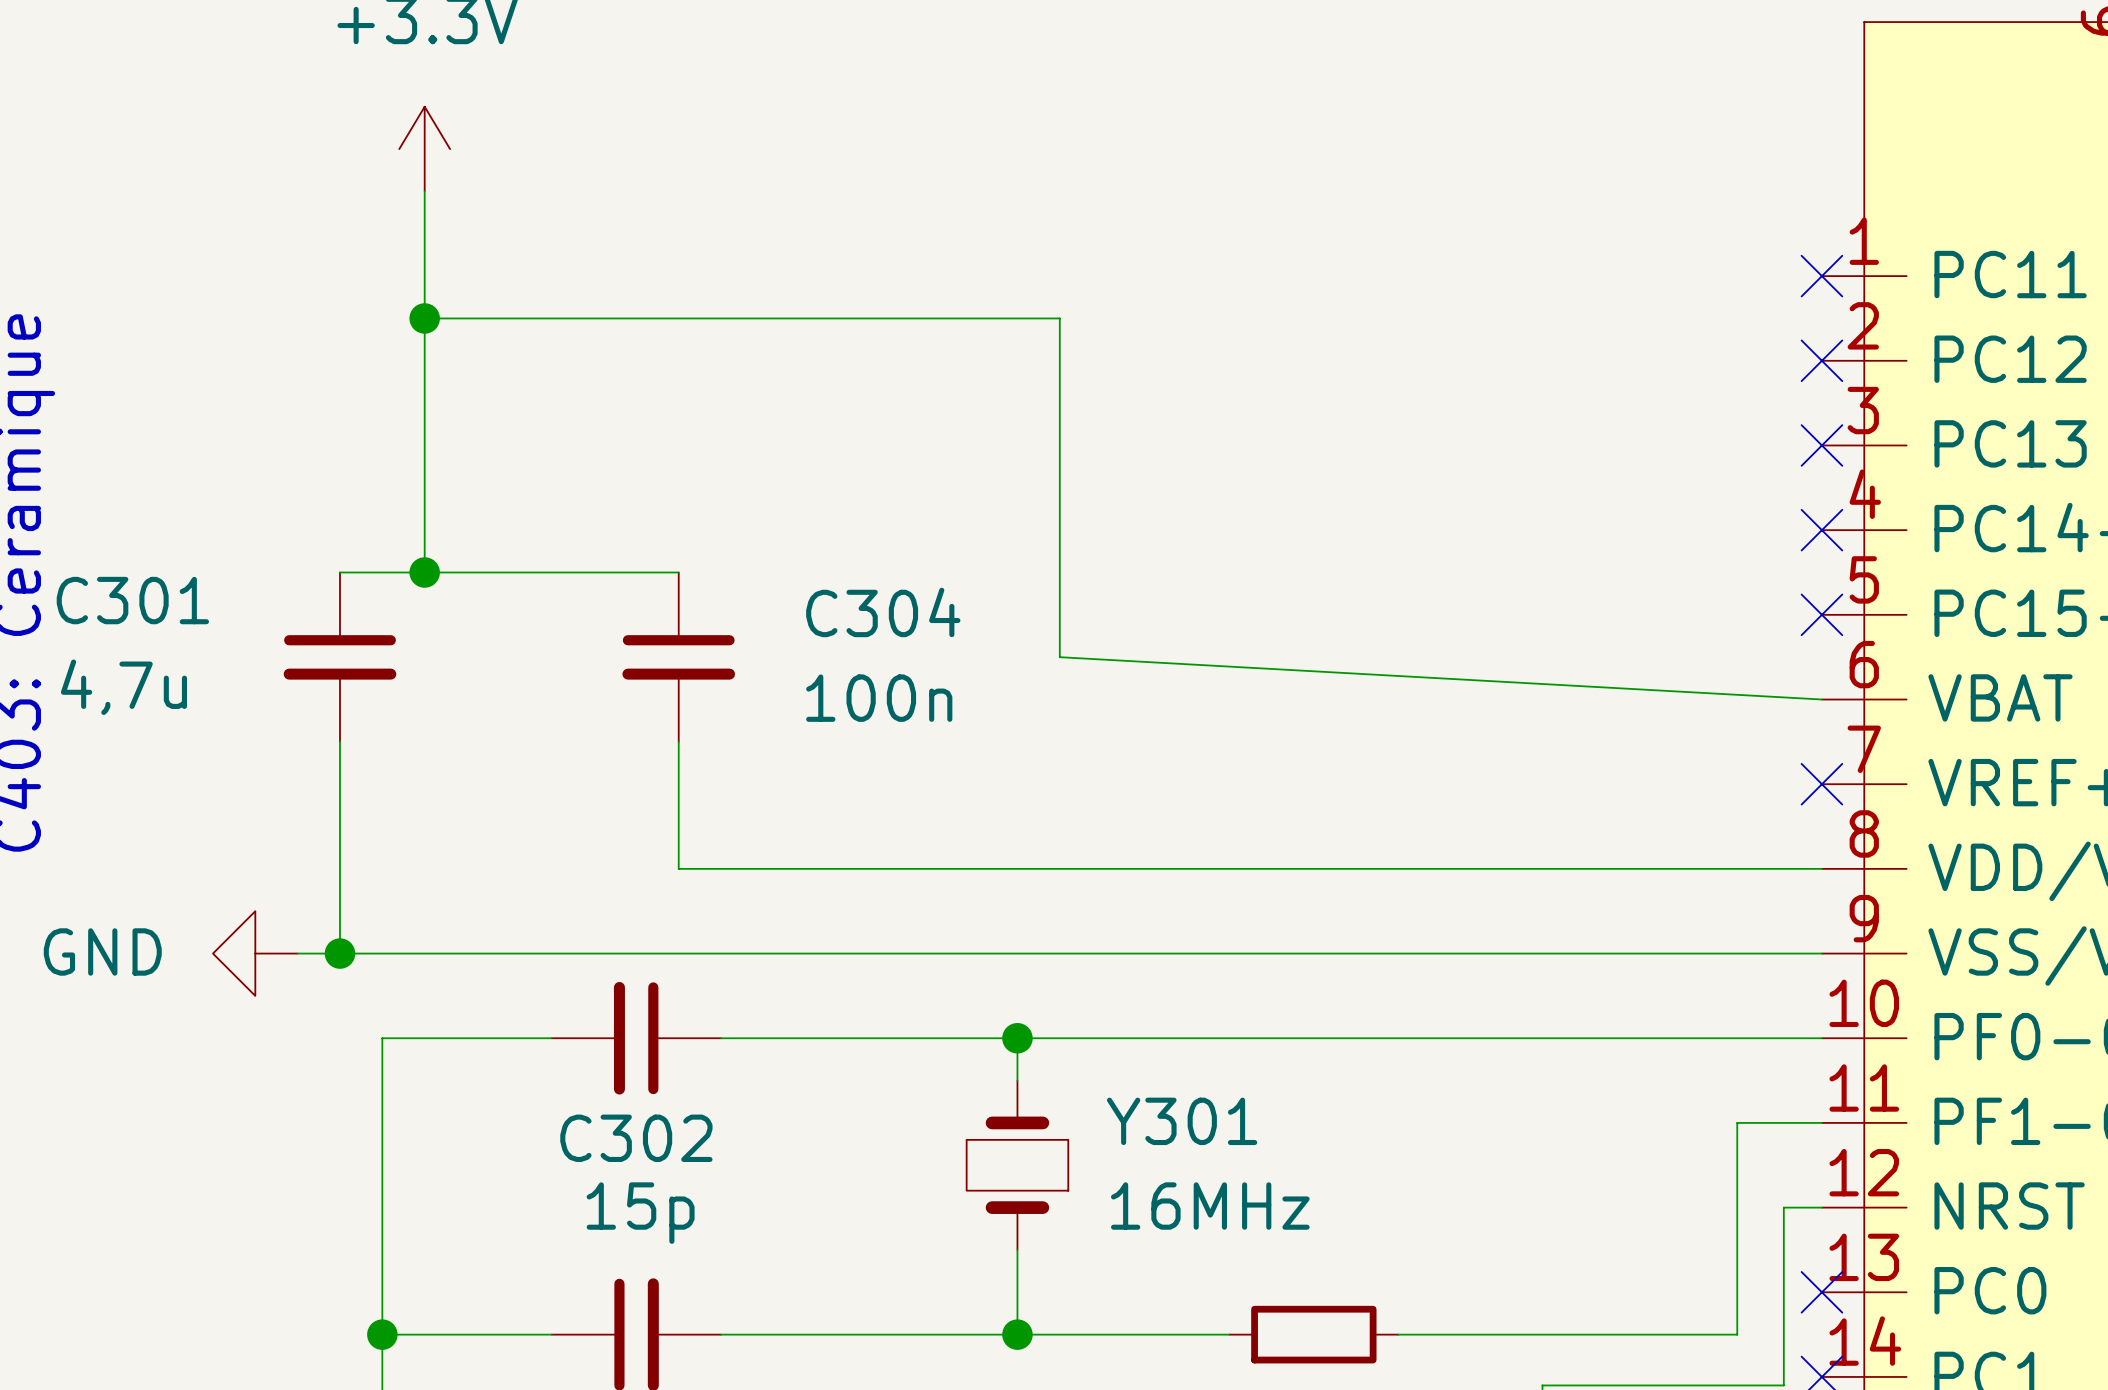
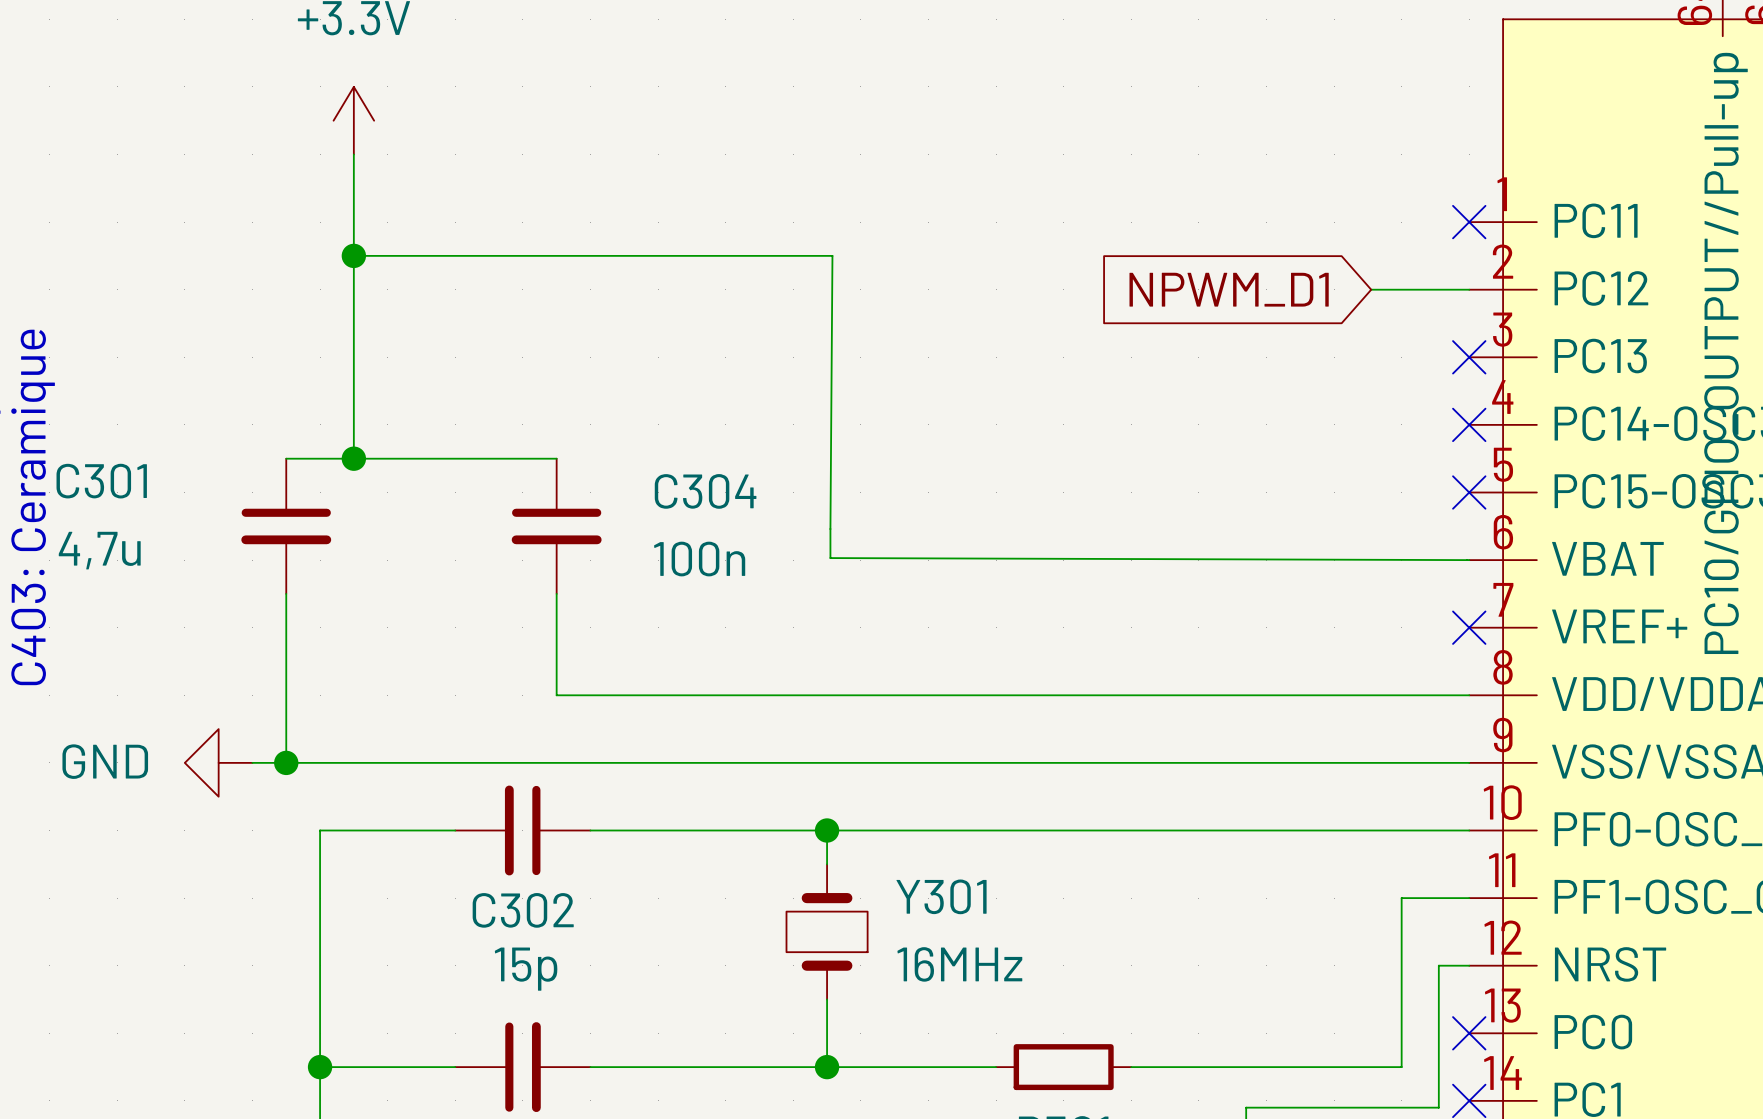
wire: (1024, 318) (1059, 318) (1059, 657) (1821, 699) -> (832, 255) (830, 558) (1469, 560)
wire: none -> (1371, 289) (1469, 289)
no-connect mark: (1821, 360) -> none
global label: none -> NPWM_D1 (1229, 289)

